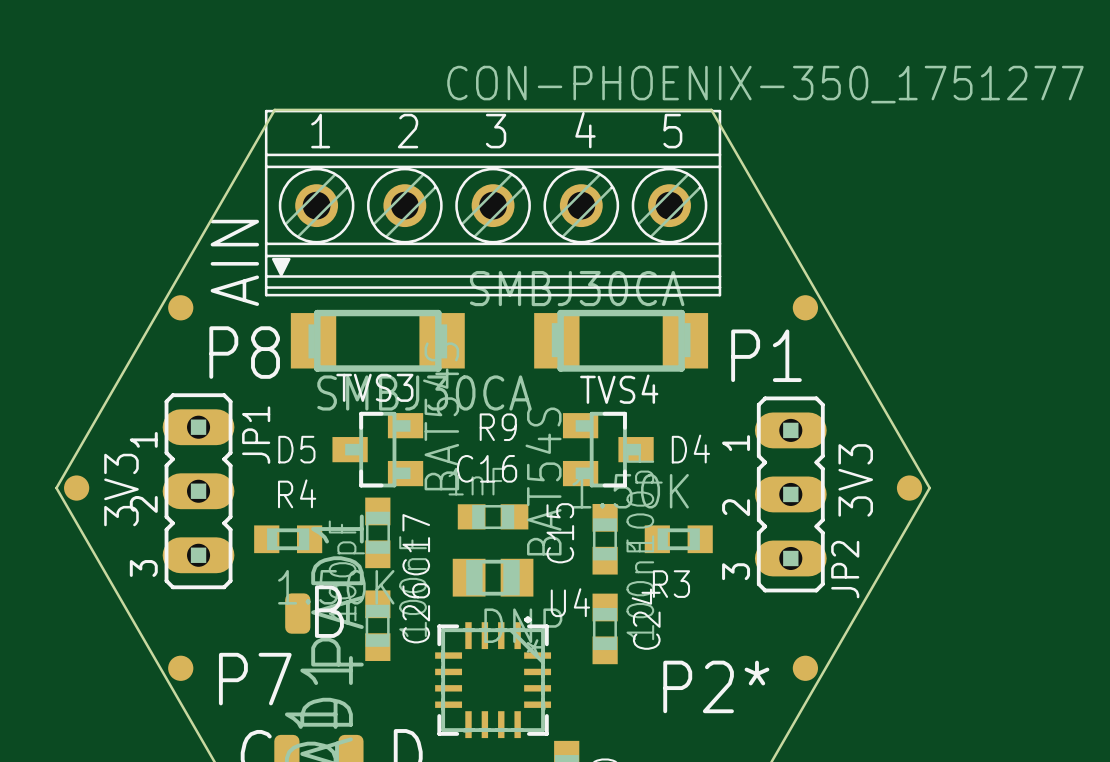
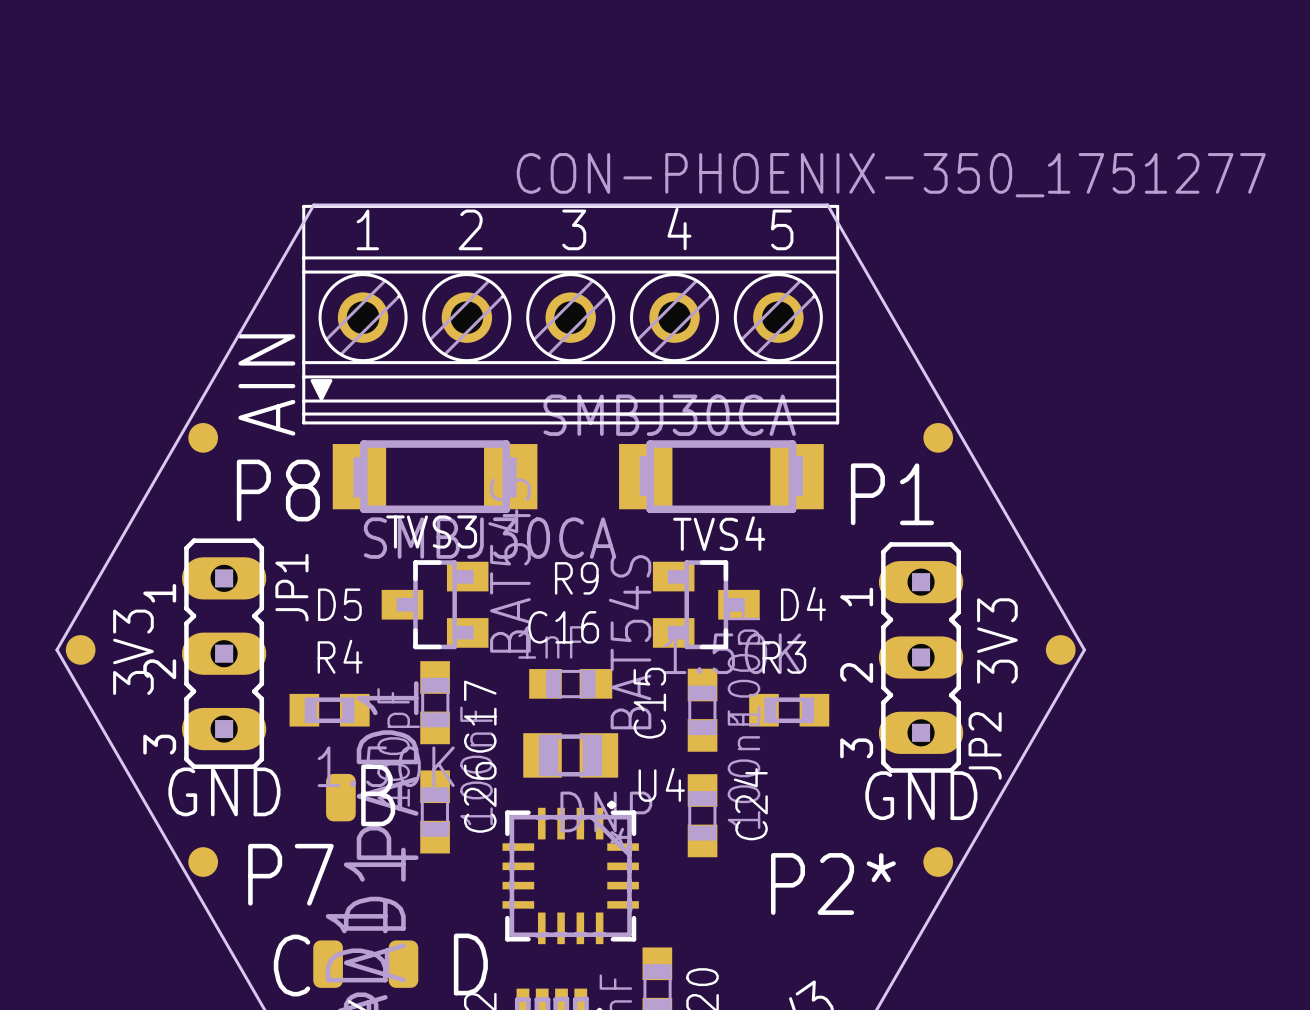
R3 name position: R3 (671, 584) -> R3 (784, 657)
text: none -> GND (224, 791)
text: none -> GND (921, 795)

